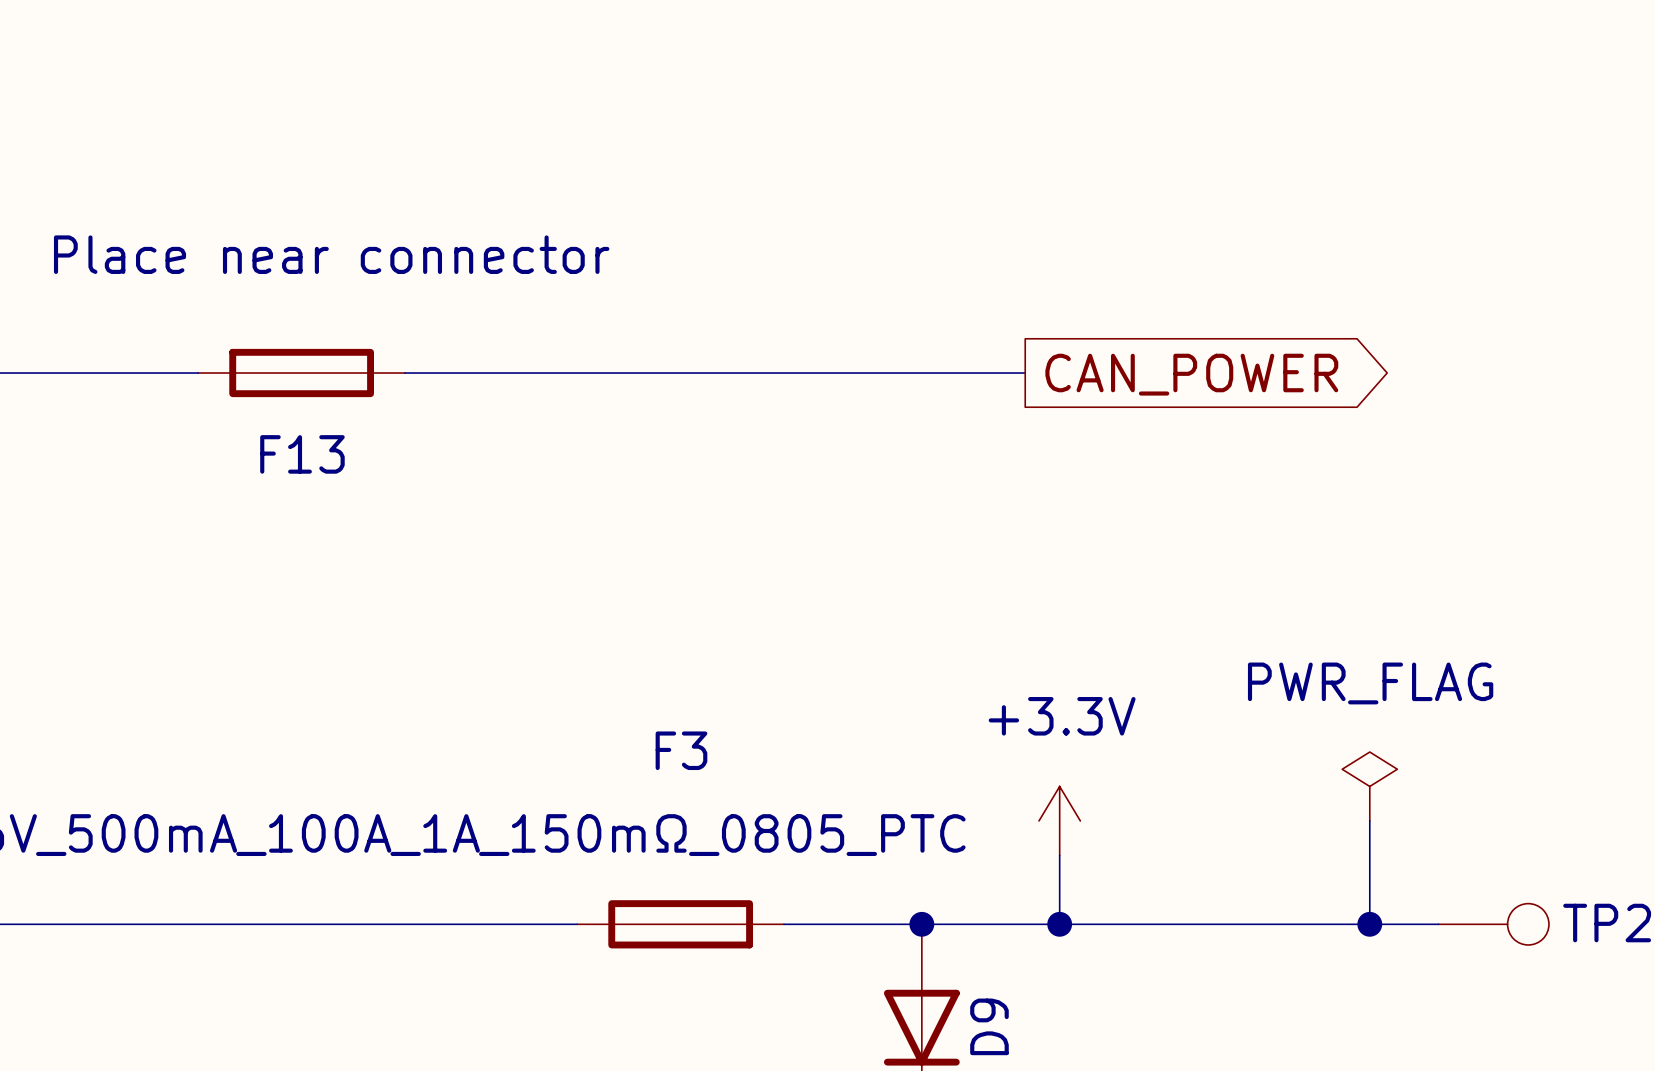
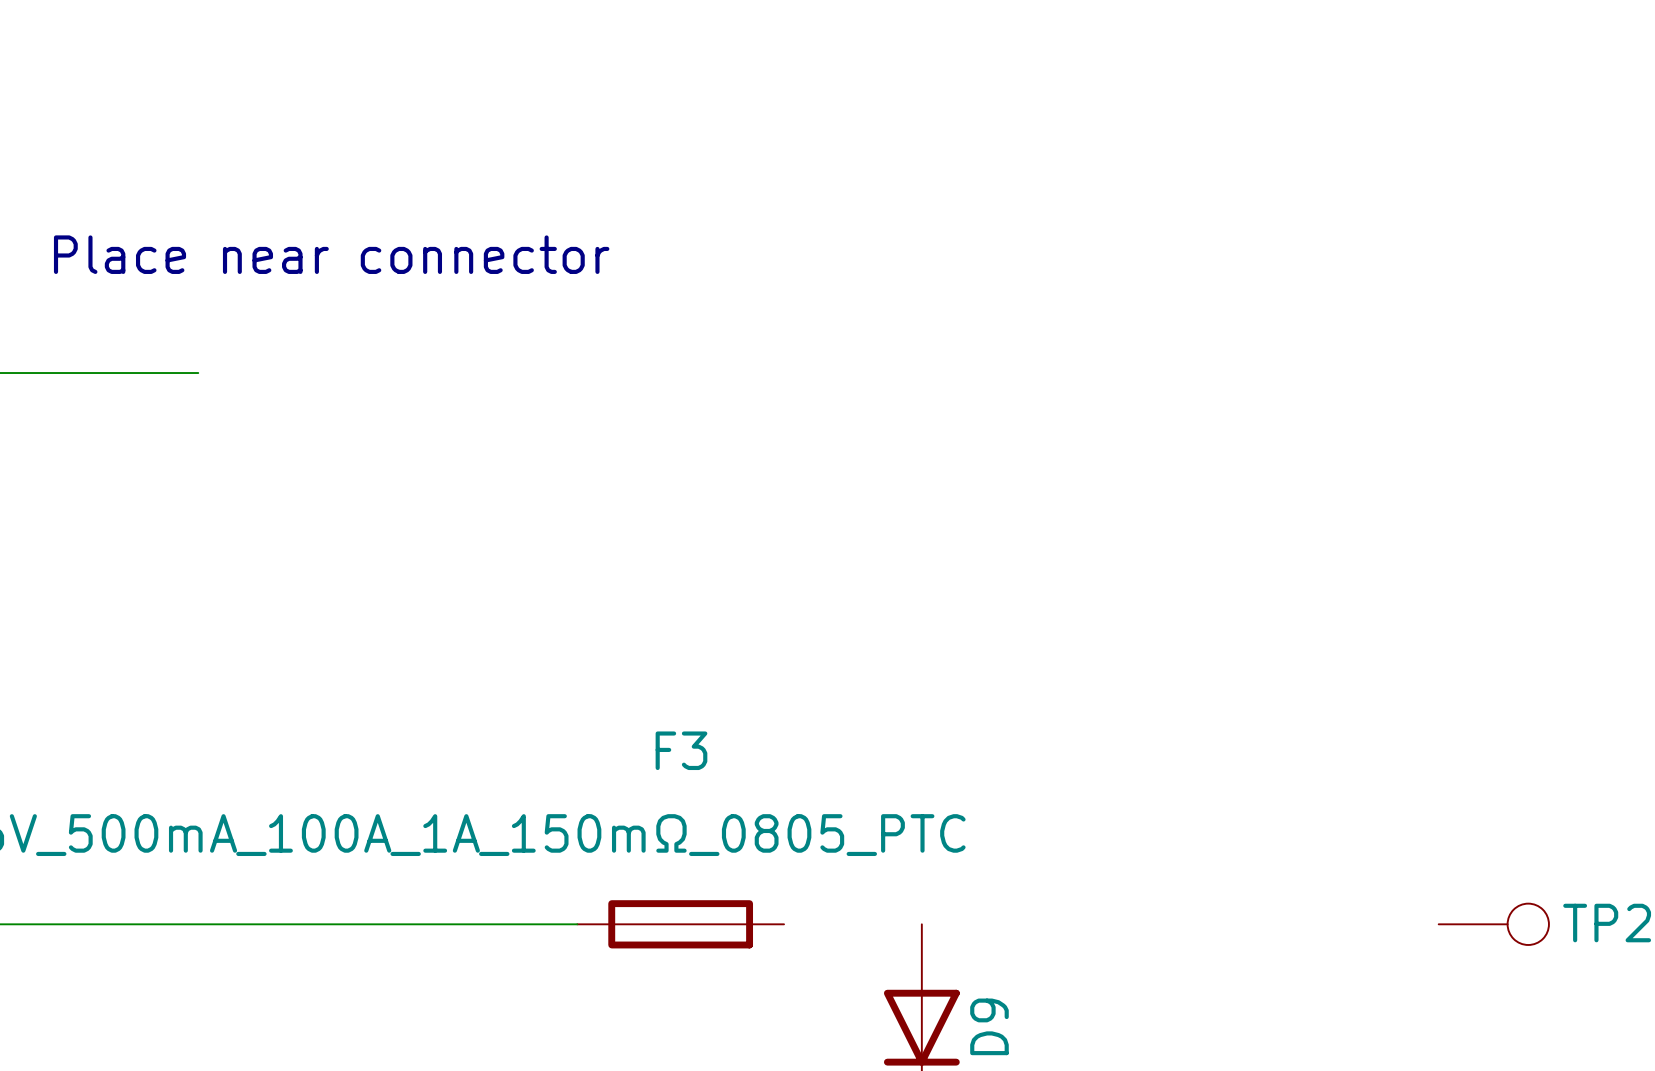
F13: (301, 373) -> none
wire: (405, 373) (1025, 373) -> none
global label: CAN_POWER (1191, 374) -> none
power symbol: PWR_FLAG (1369, 786) -> none
power symbol: +3.3V (1059, 820) -> none
wire: (1369, 820) (1369, 924) -> none
wire: (1059, 855) (1059, 924) -> none
wire: (784, 924) (1438, 924) -> none
junction: (921, 924) -> none
junction: (1059, 924) -> none
junction: (1369, 924) -> none

